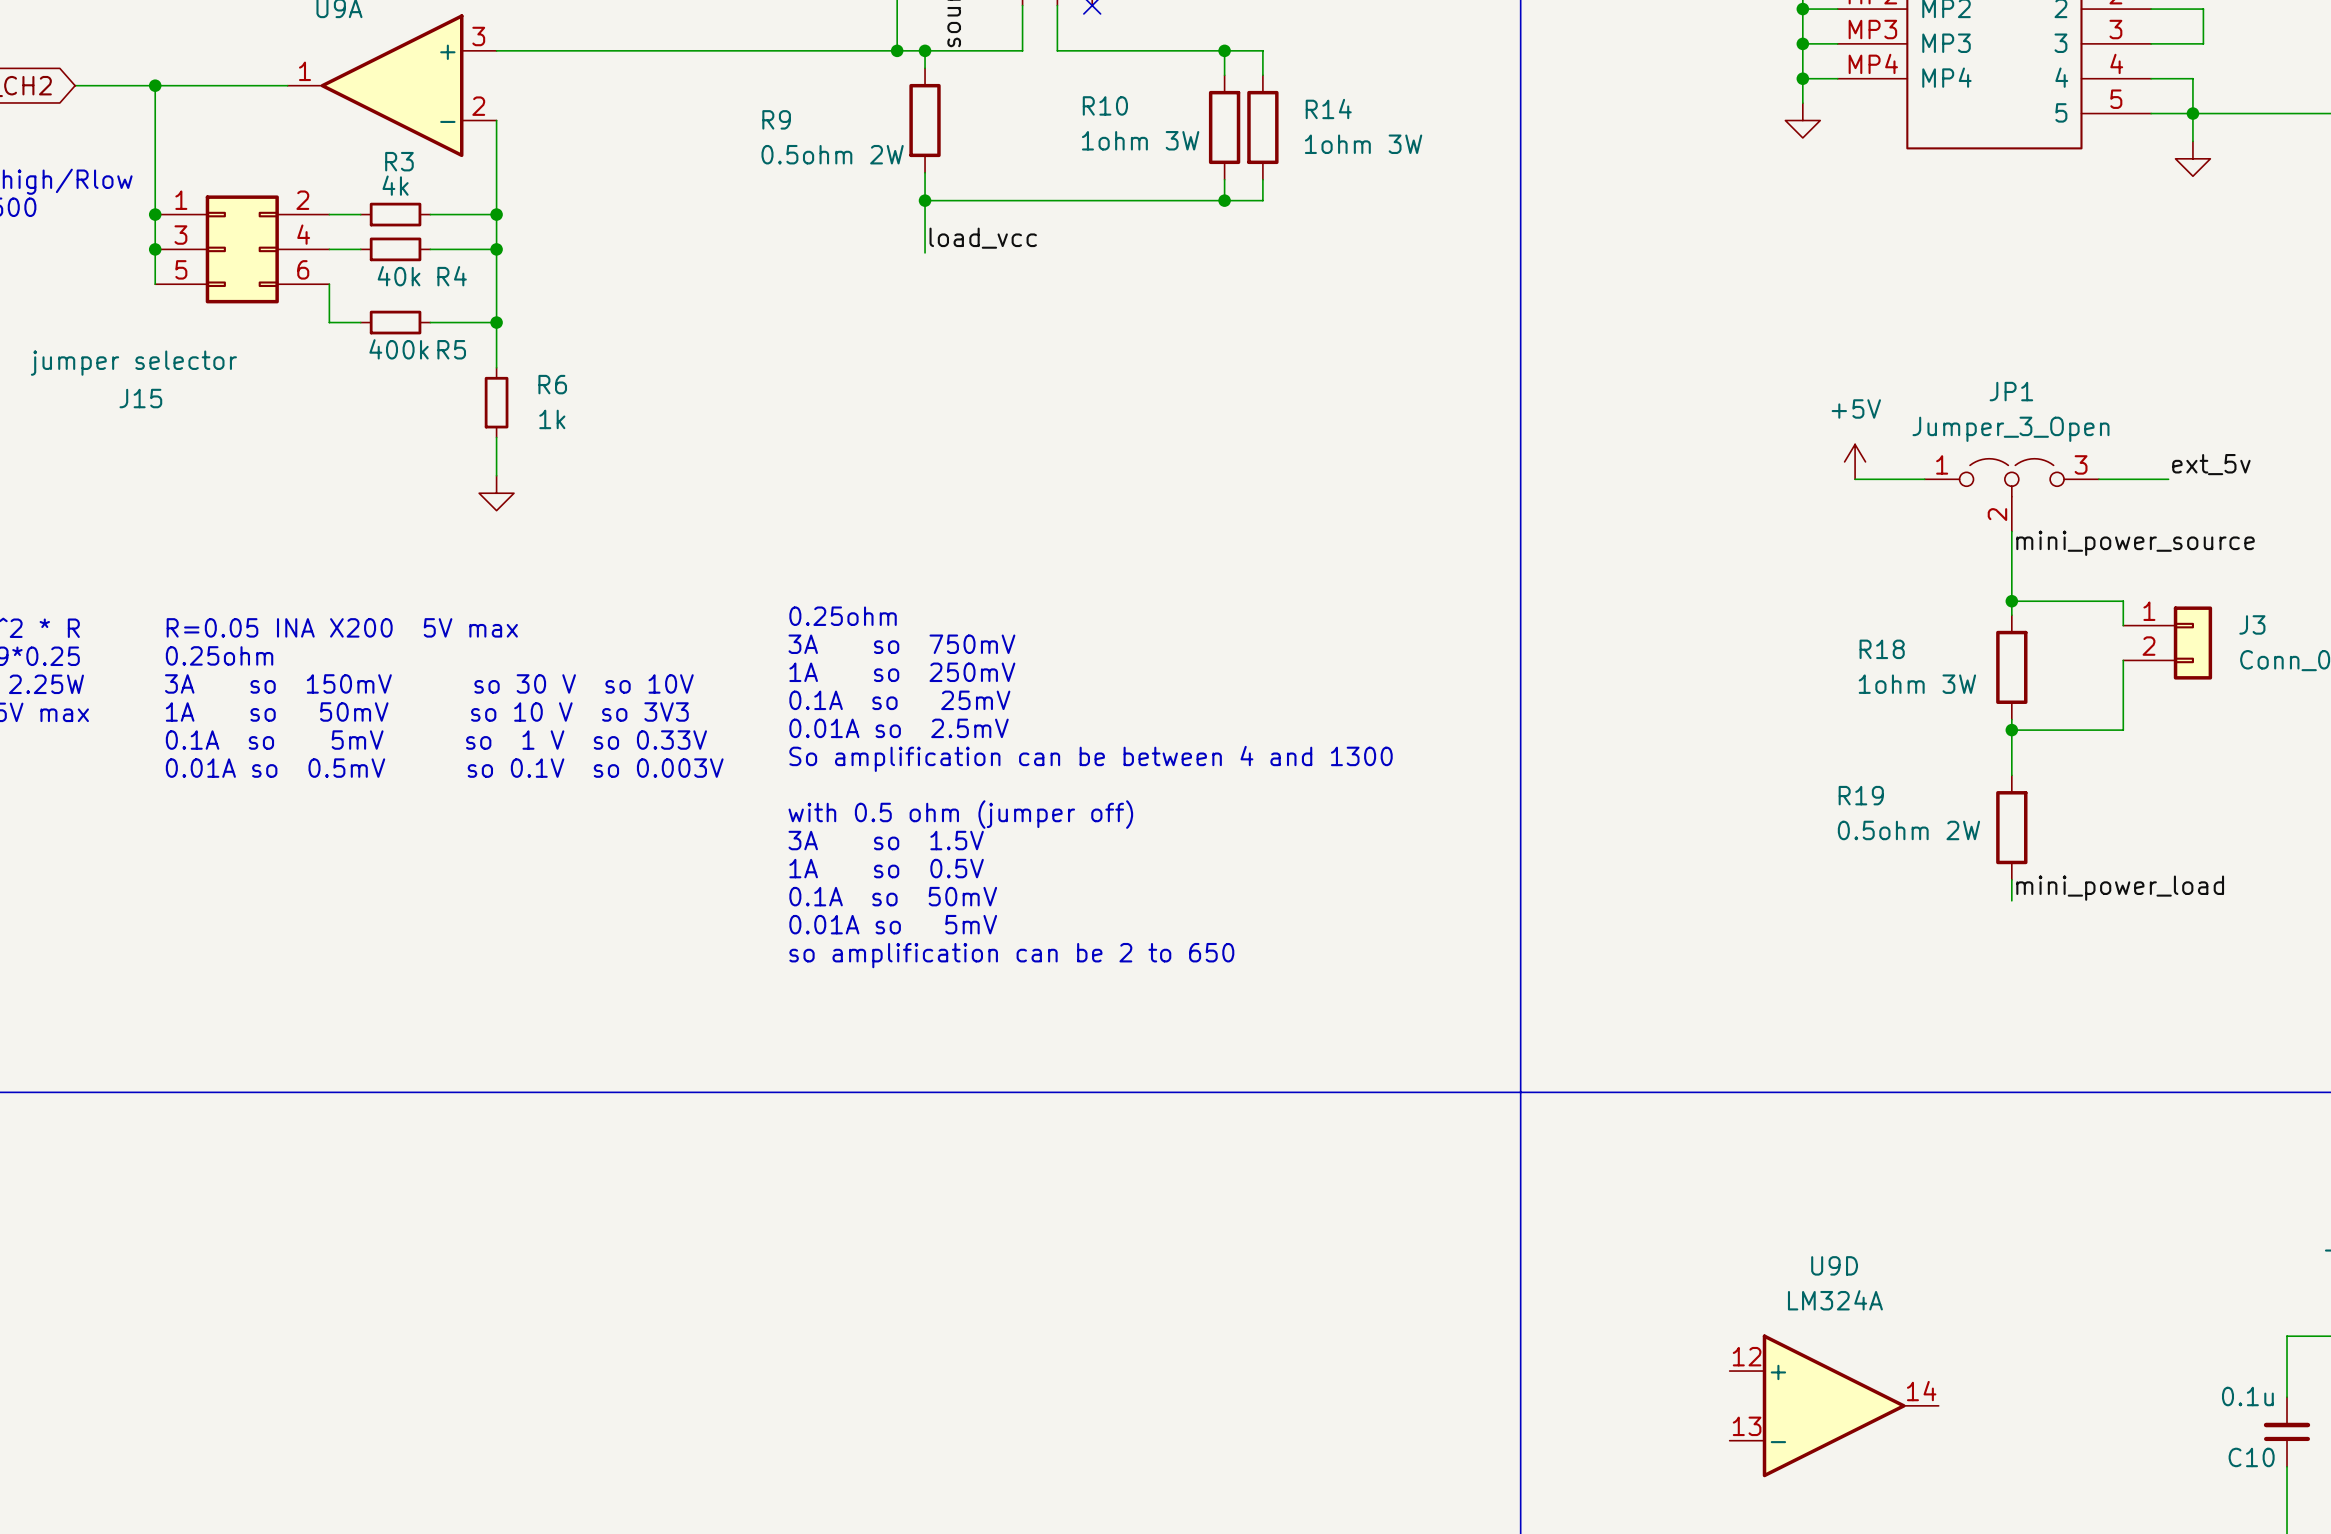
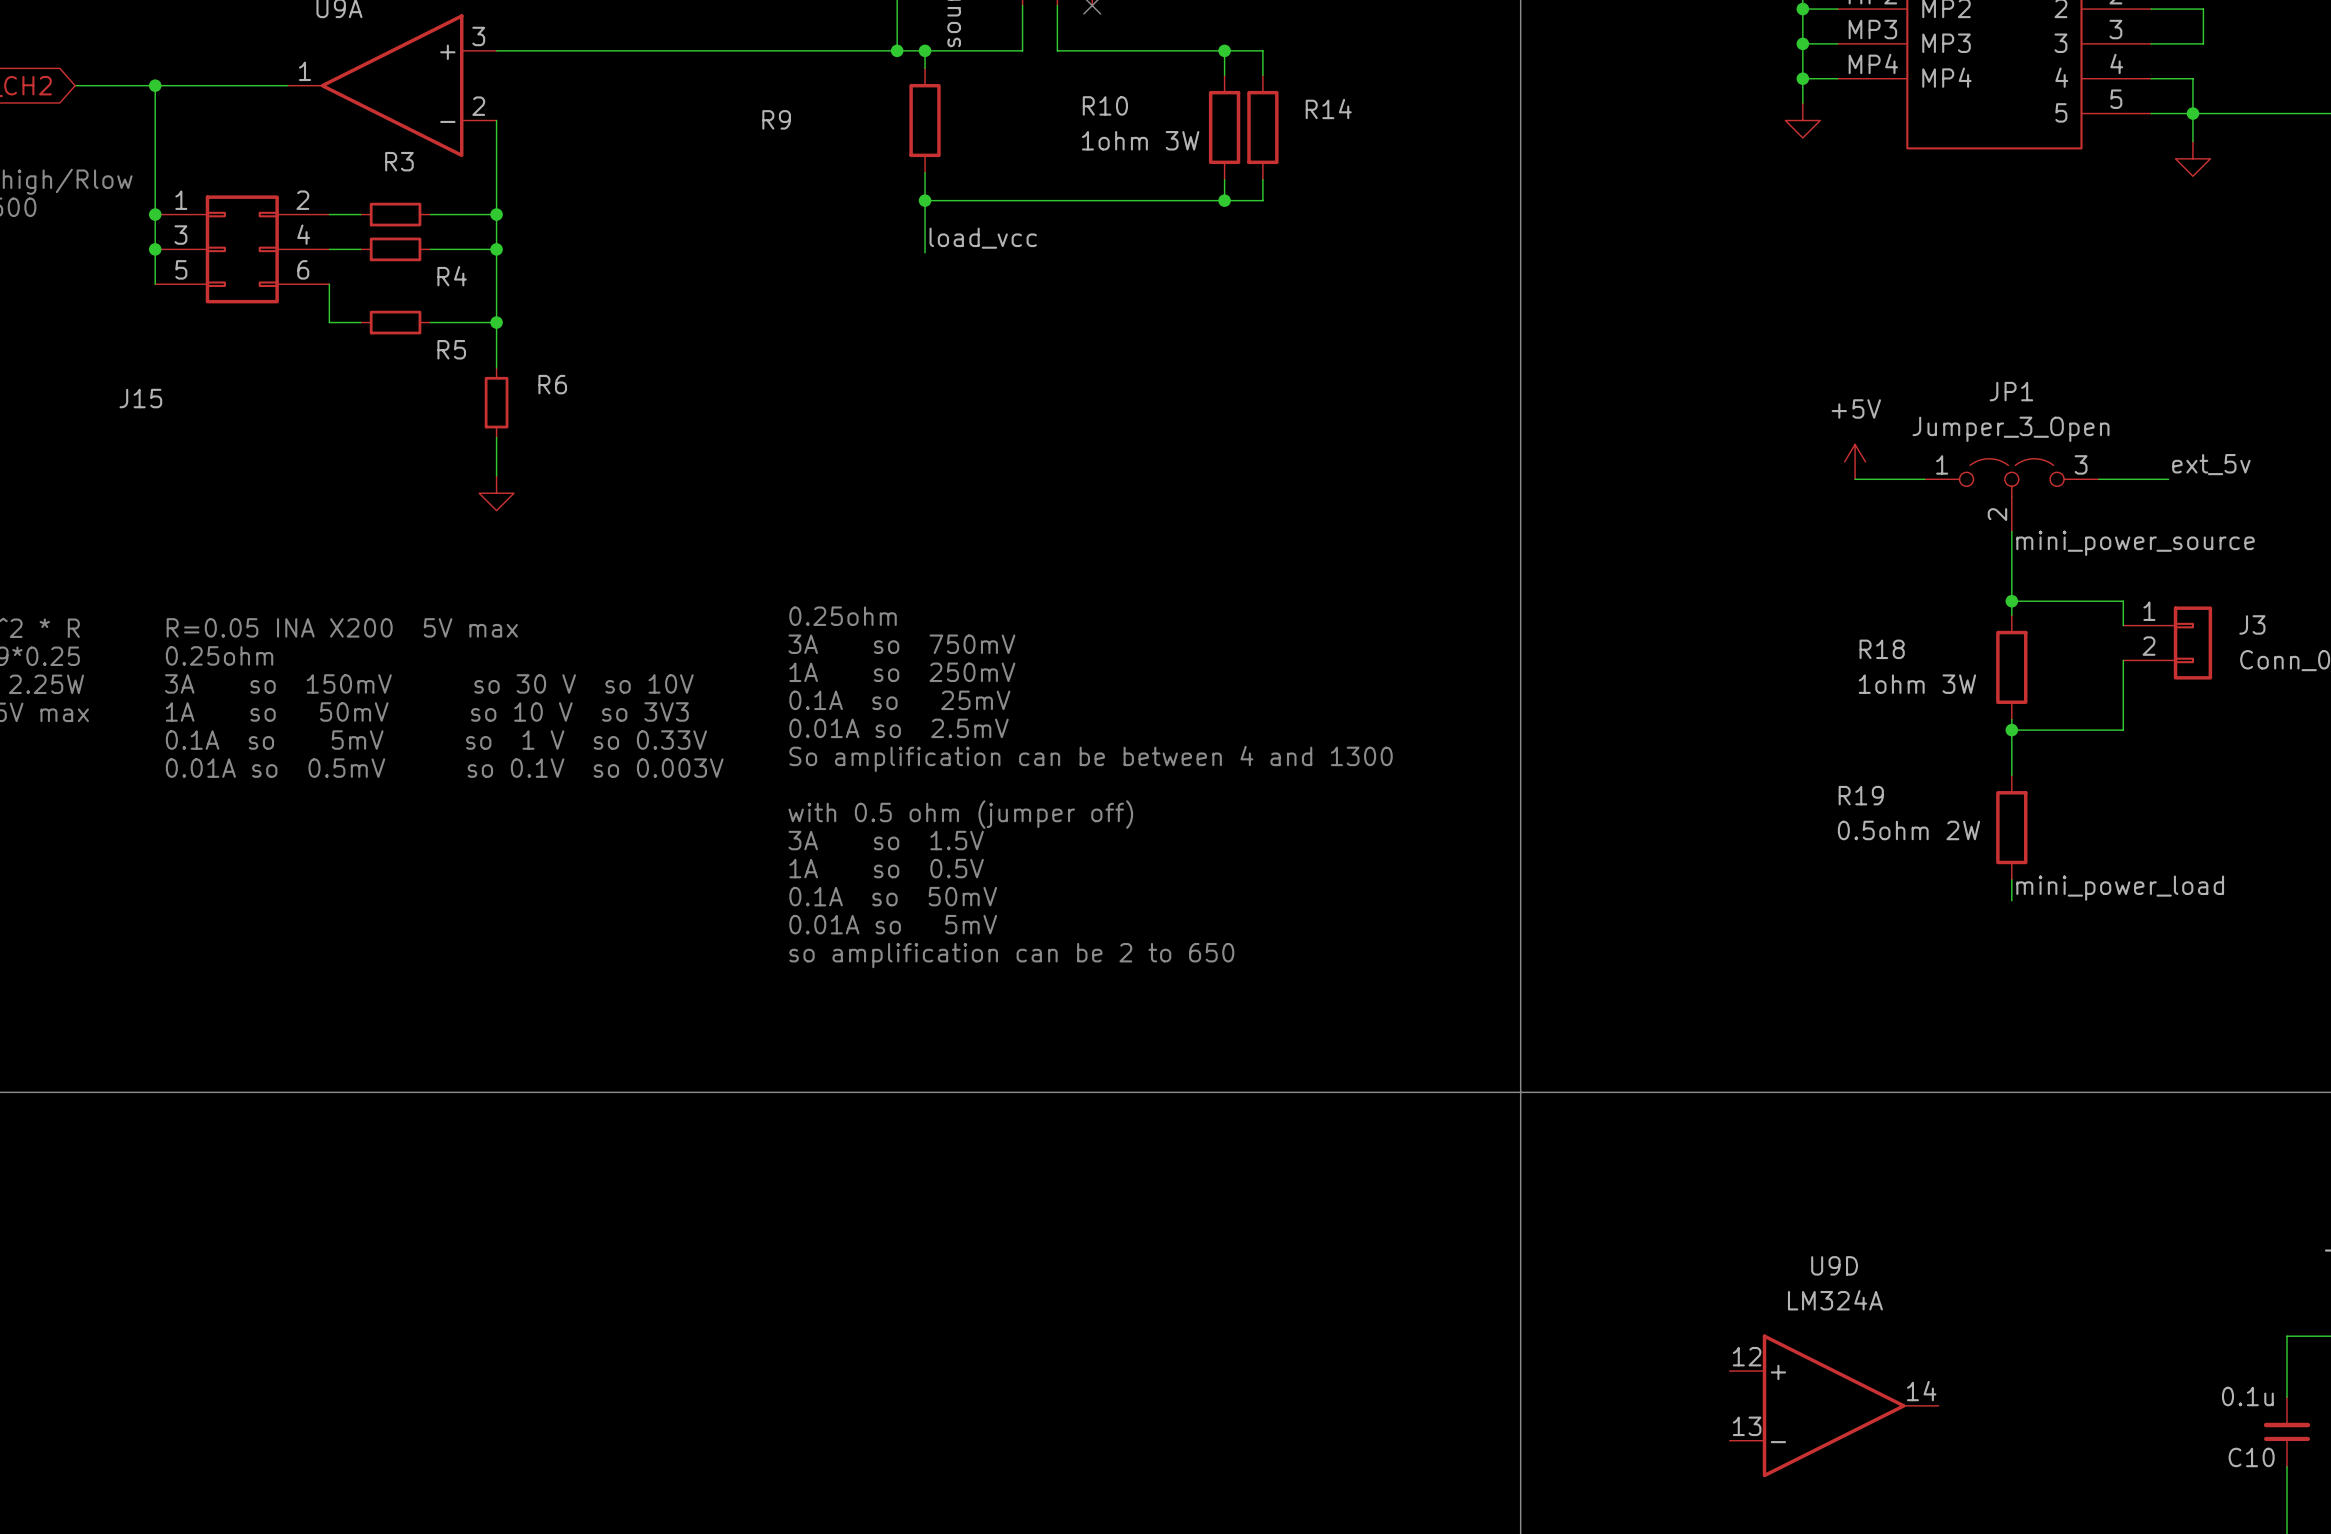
R14 value: 1ohm 3W (1363, 144) -> none
R9 value: 0.5ohm 2W (832, 154) -> none
R3 value: 4k (395, 185) -> none
R4 value: 40k (399, 276) -> none
R5 value: 400k (399, 349) -> none
J15 value: jumper selector (133, 363) -> none
R6 value: 1k (552, 419) -> none

